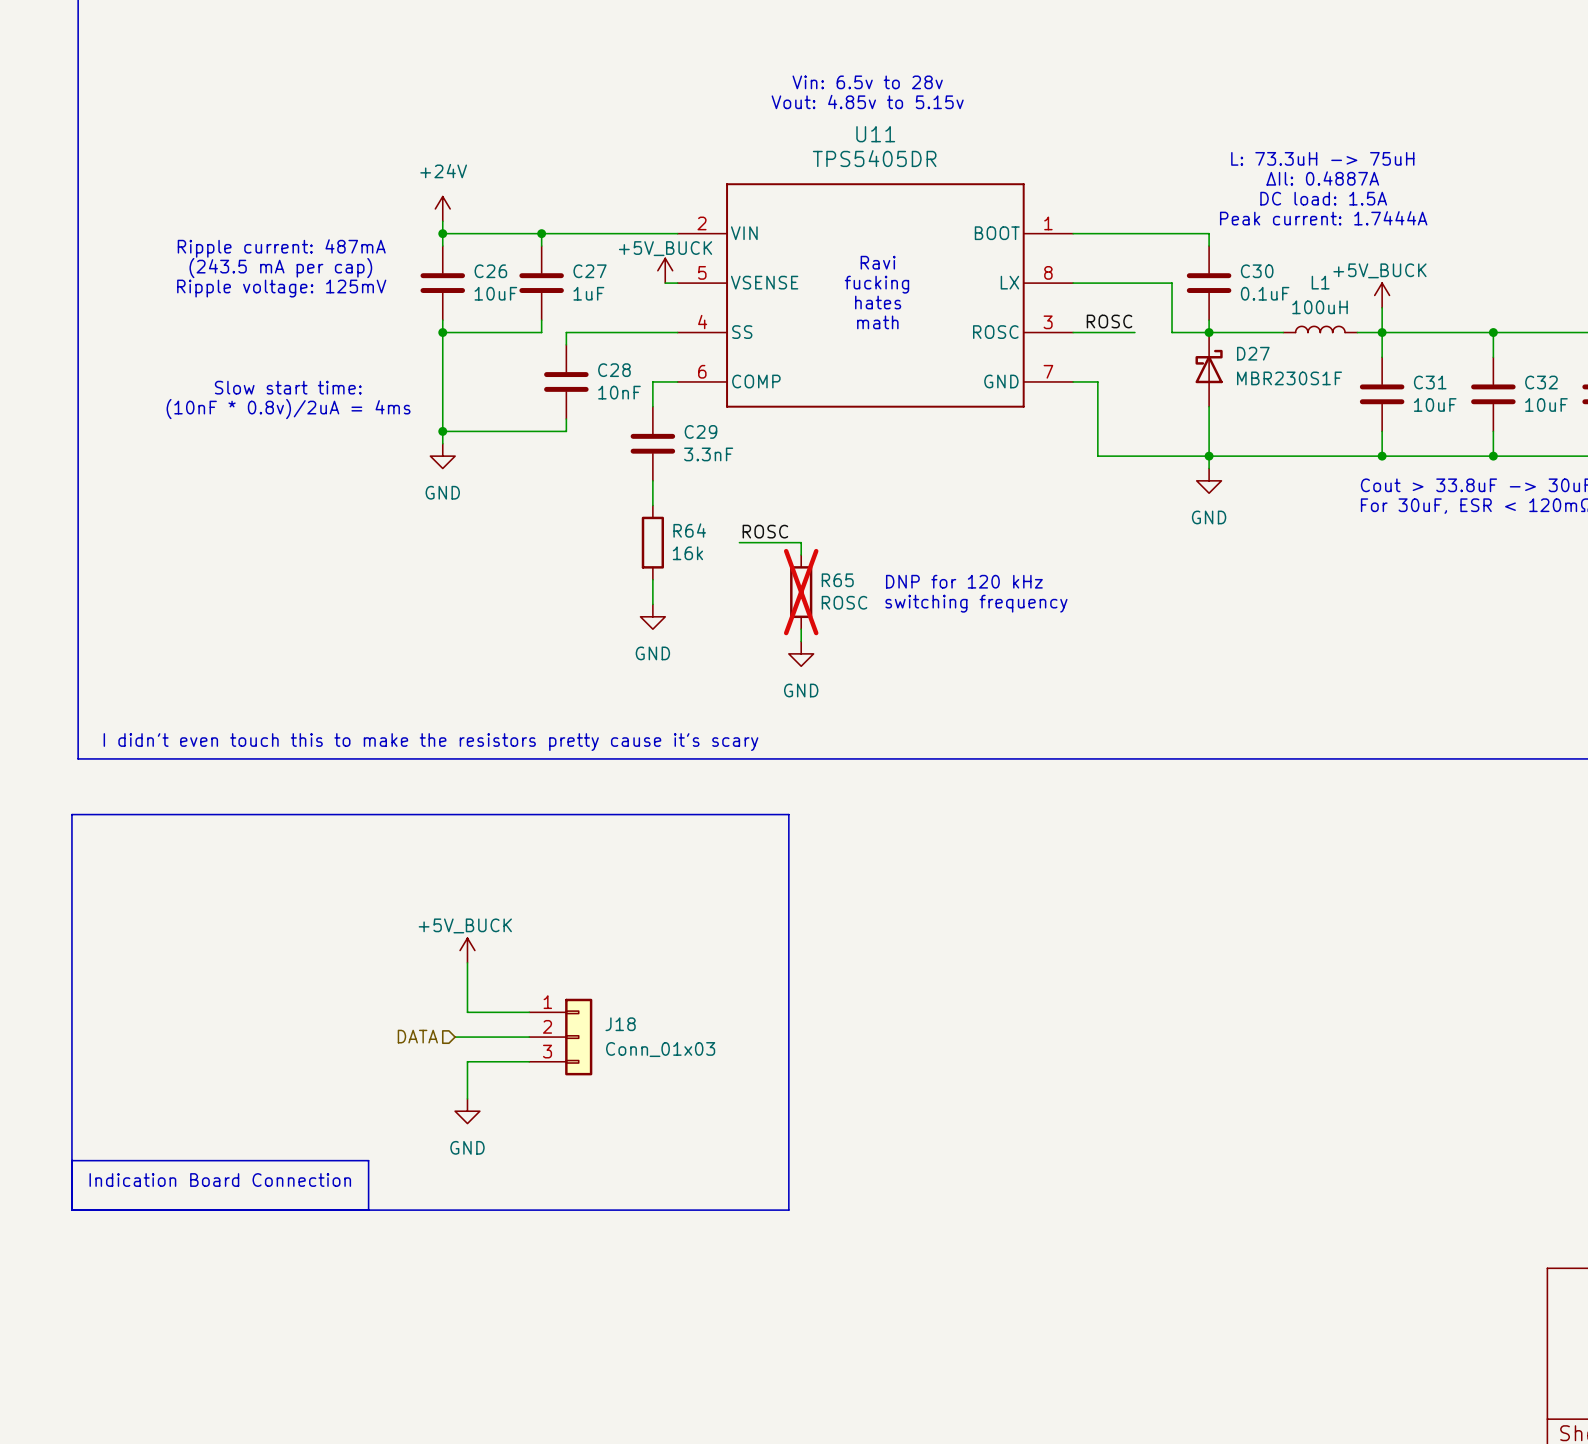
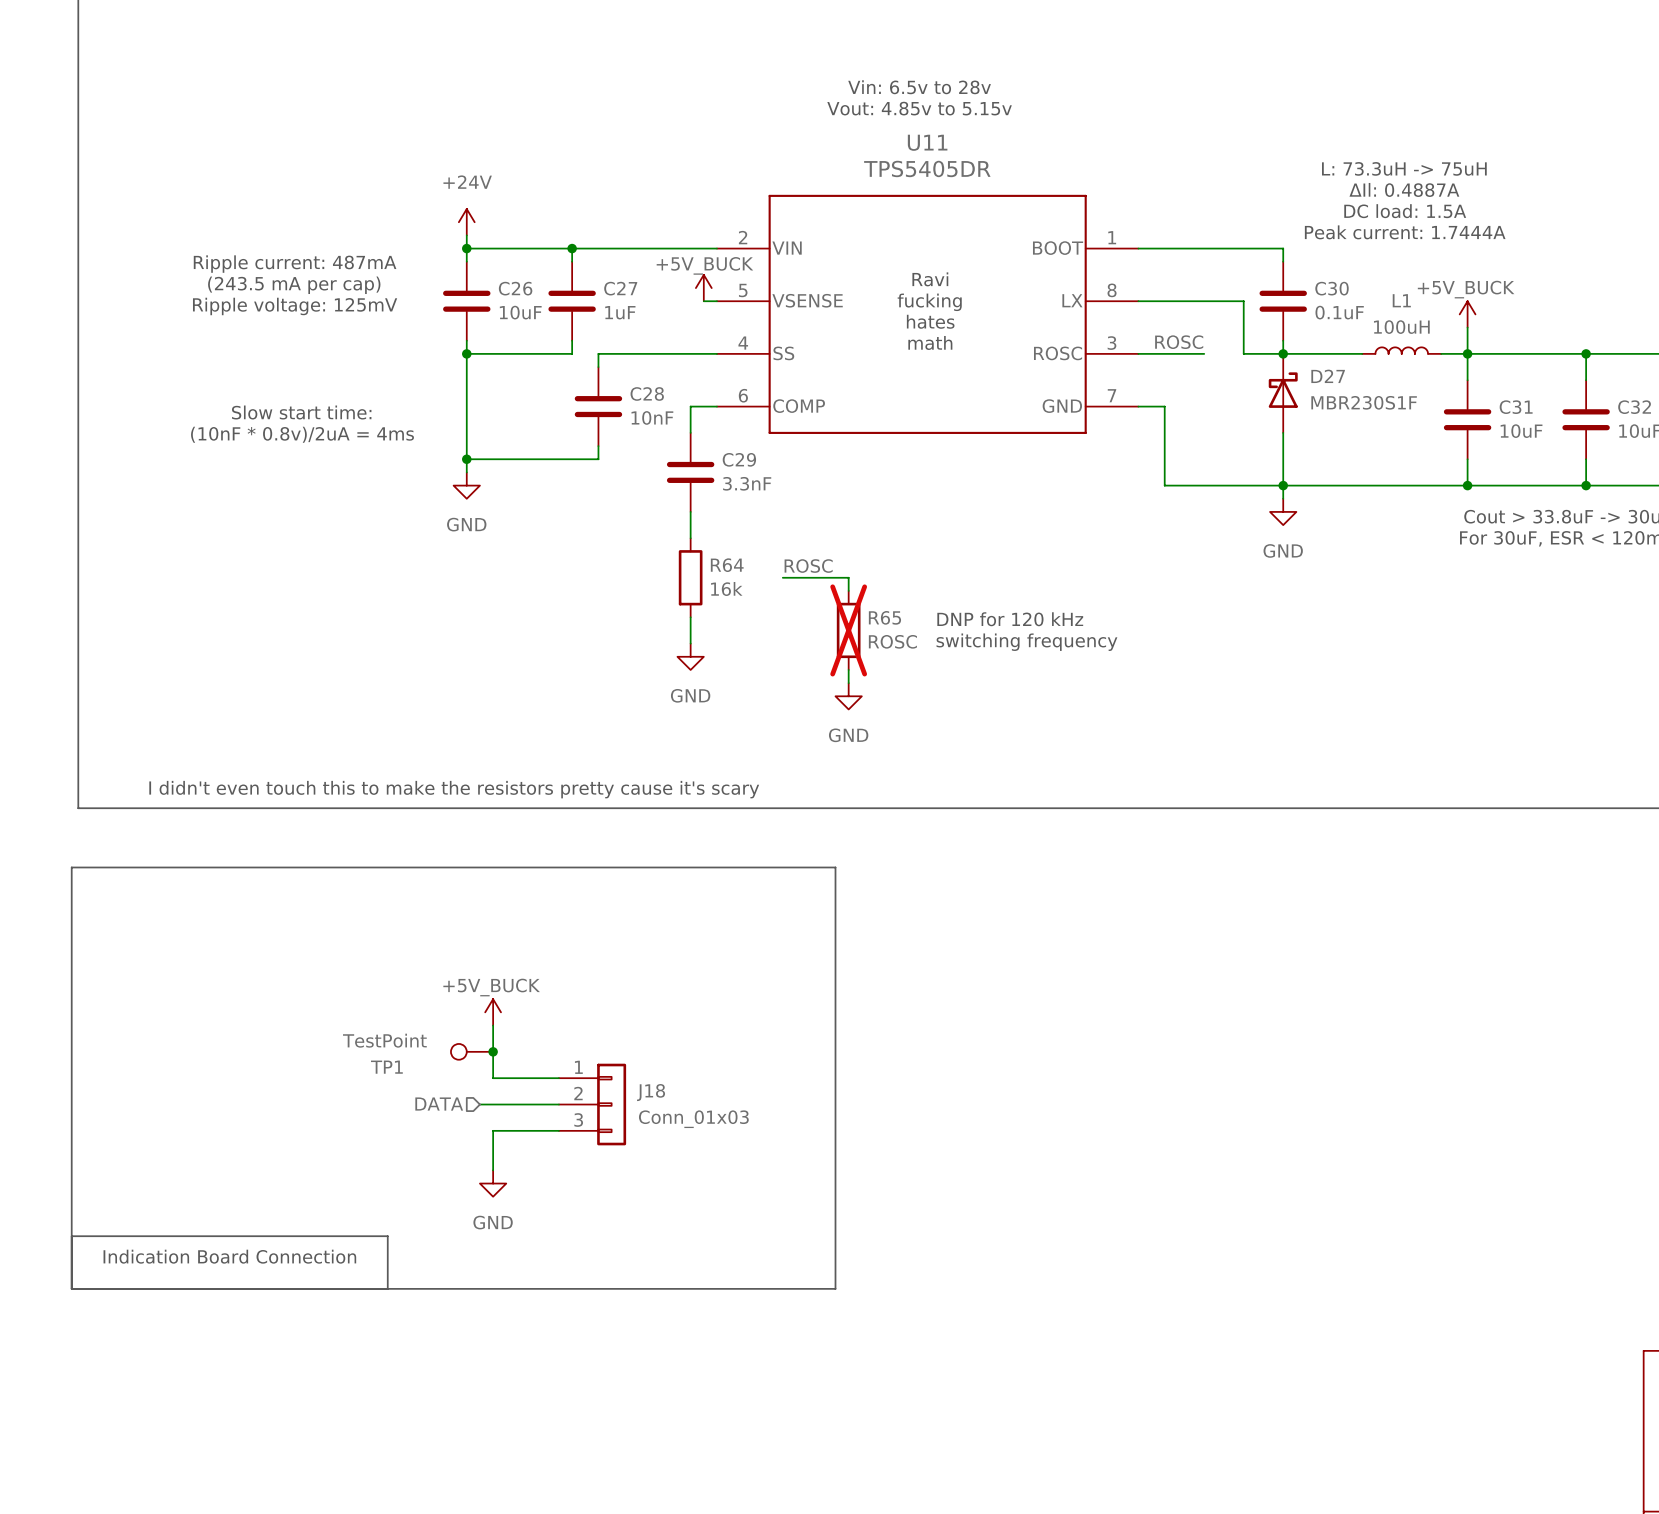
TP1: none -> TestPoint (472, 1051)
junction: none -> (493, 1051)

